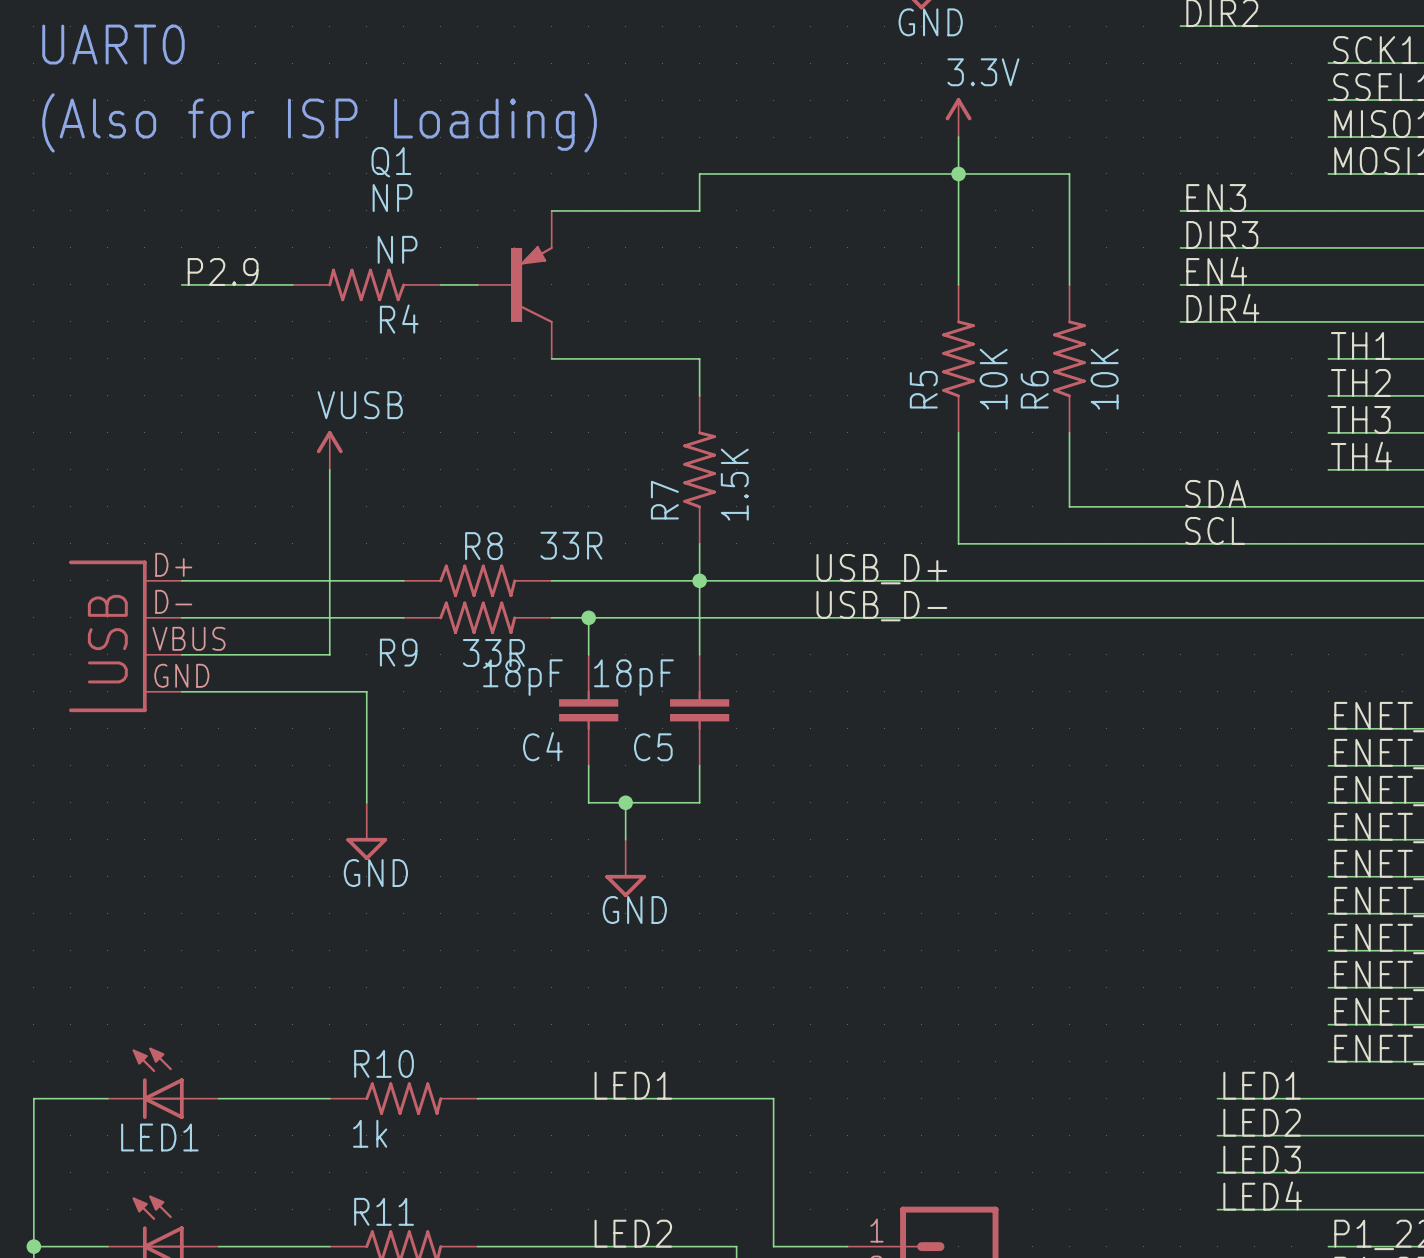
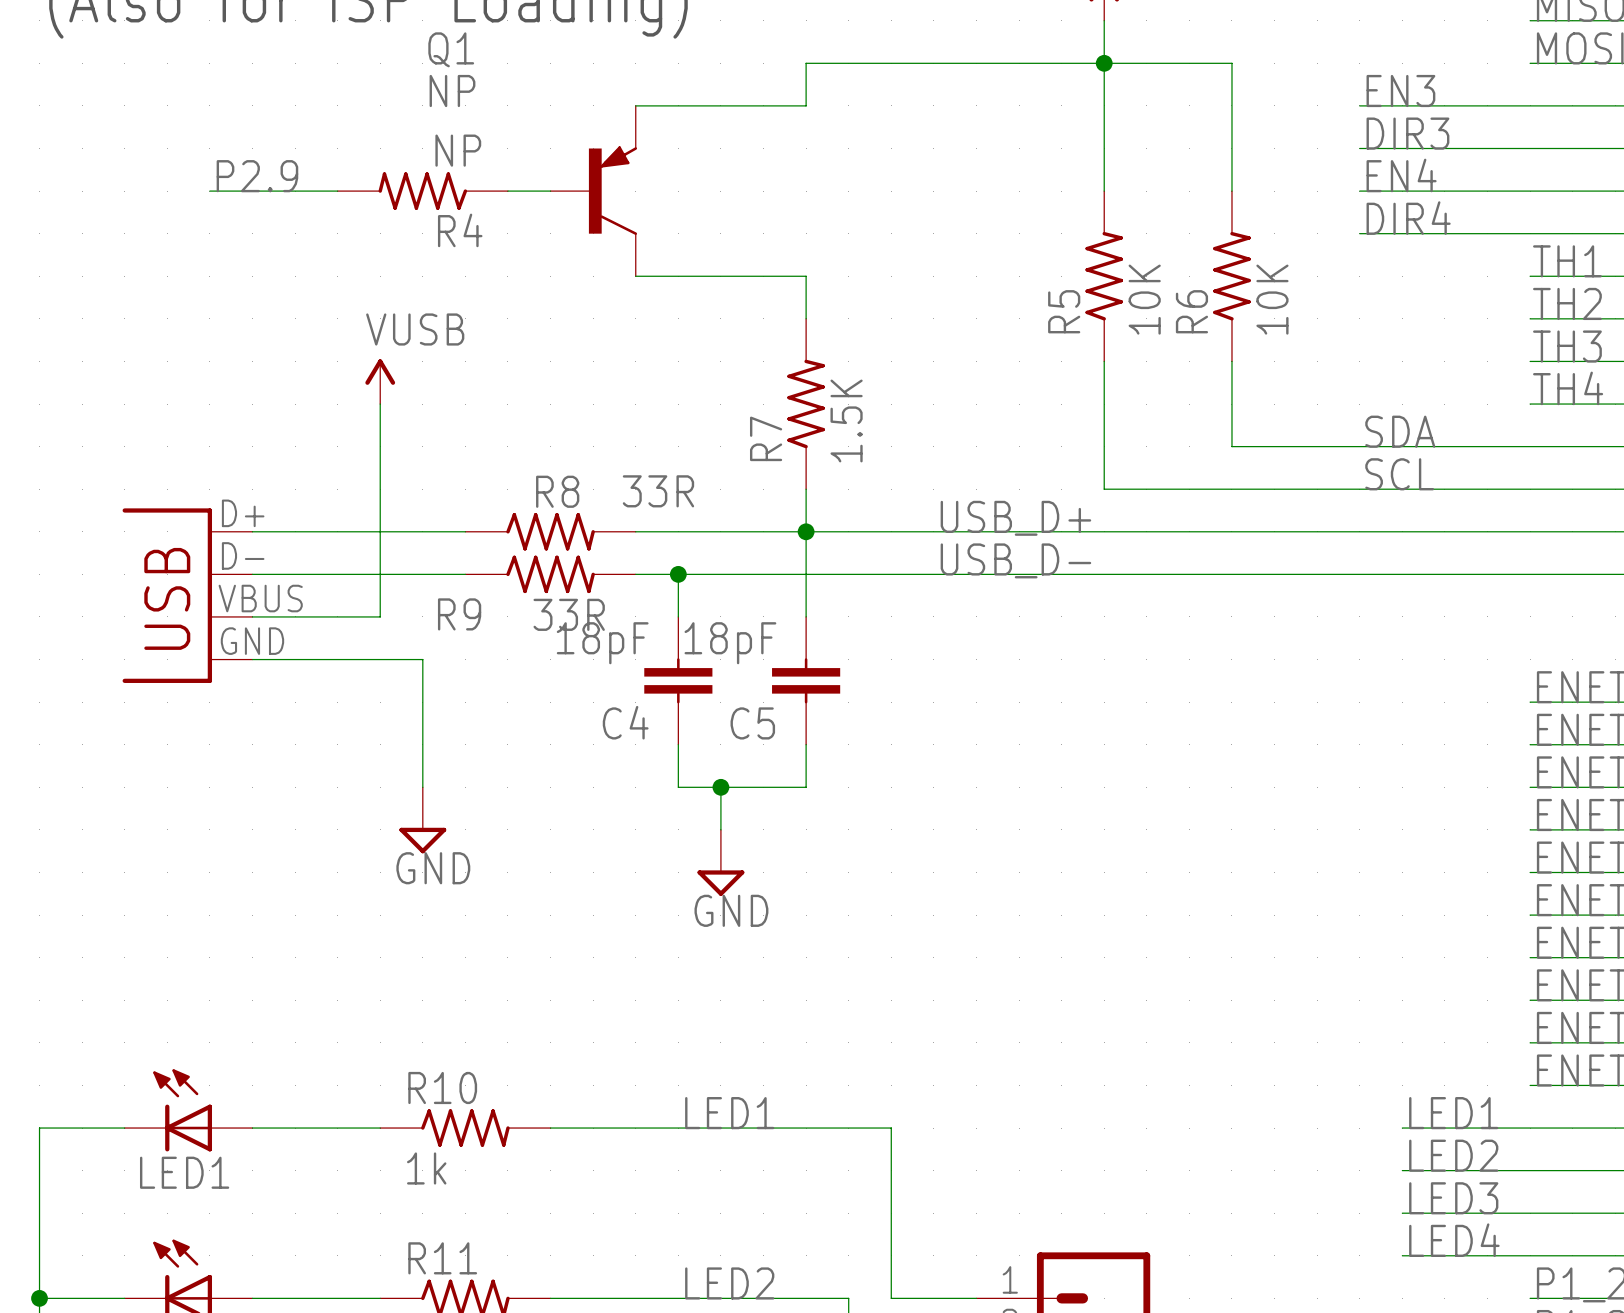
part position: (125, 636) -> (187, 595)

